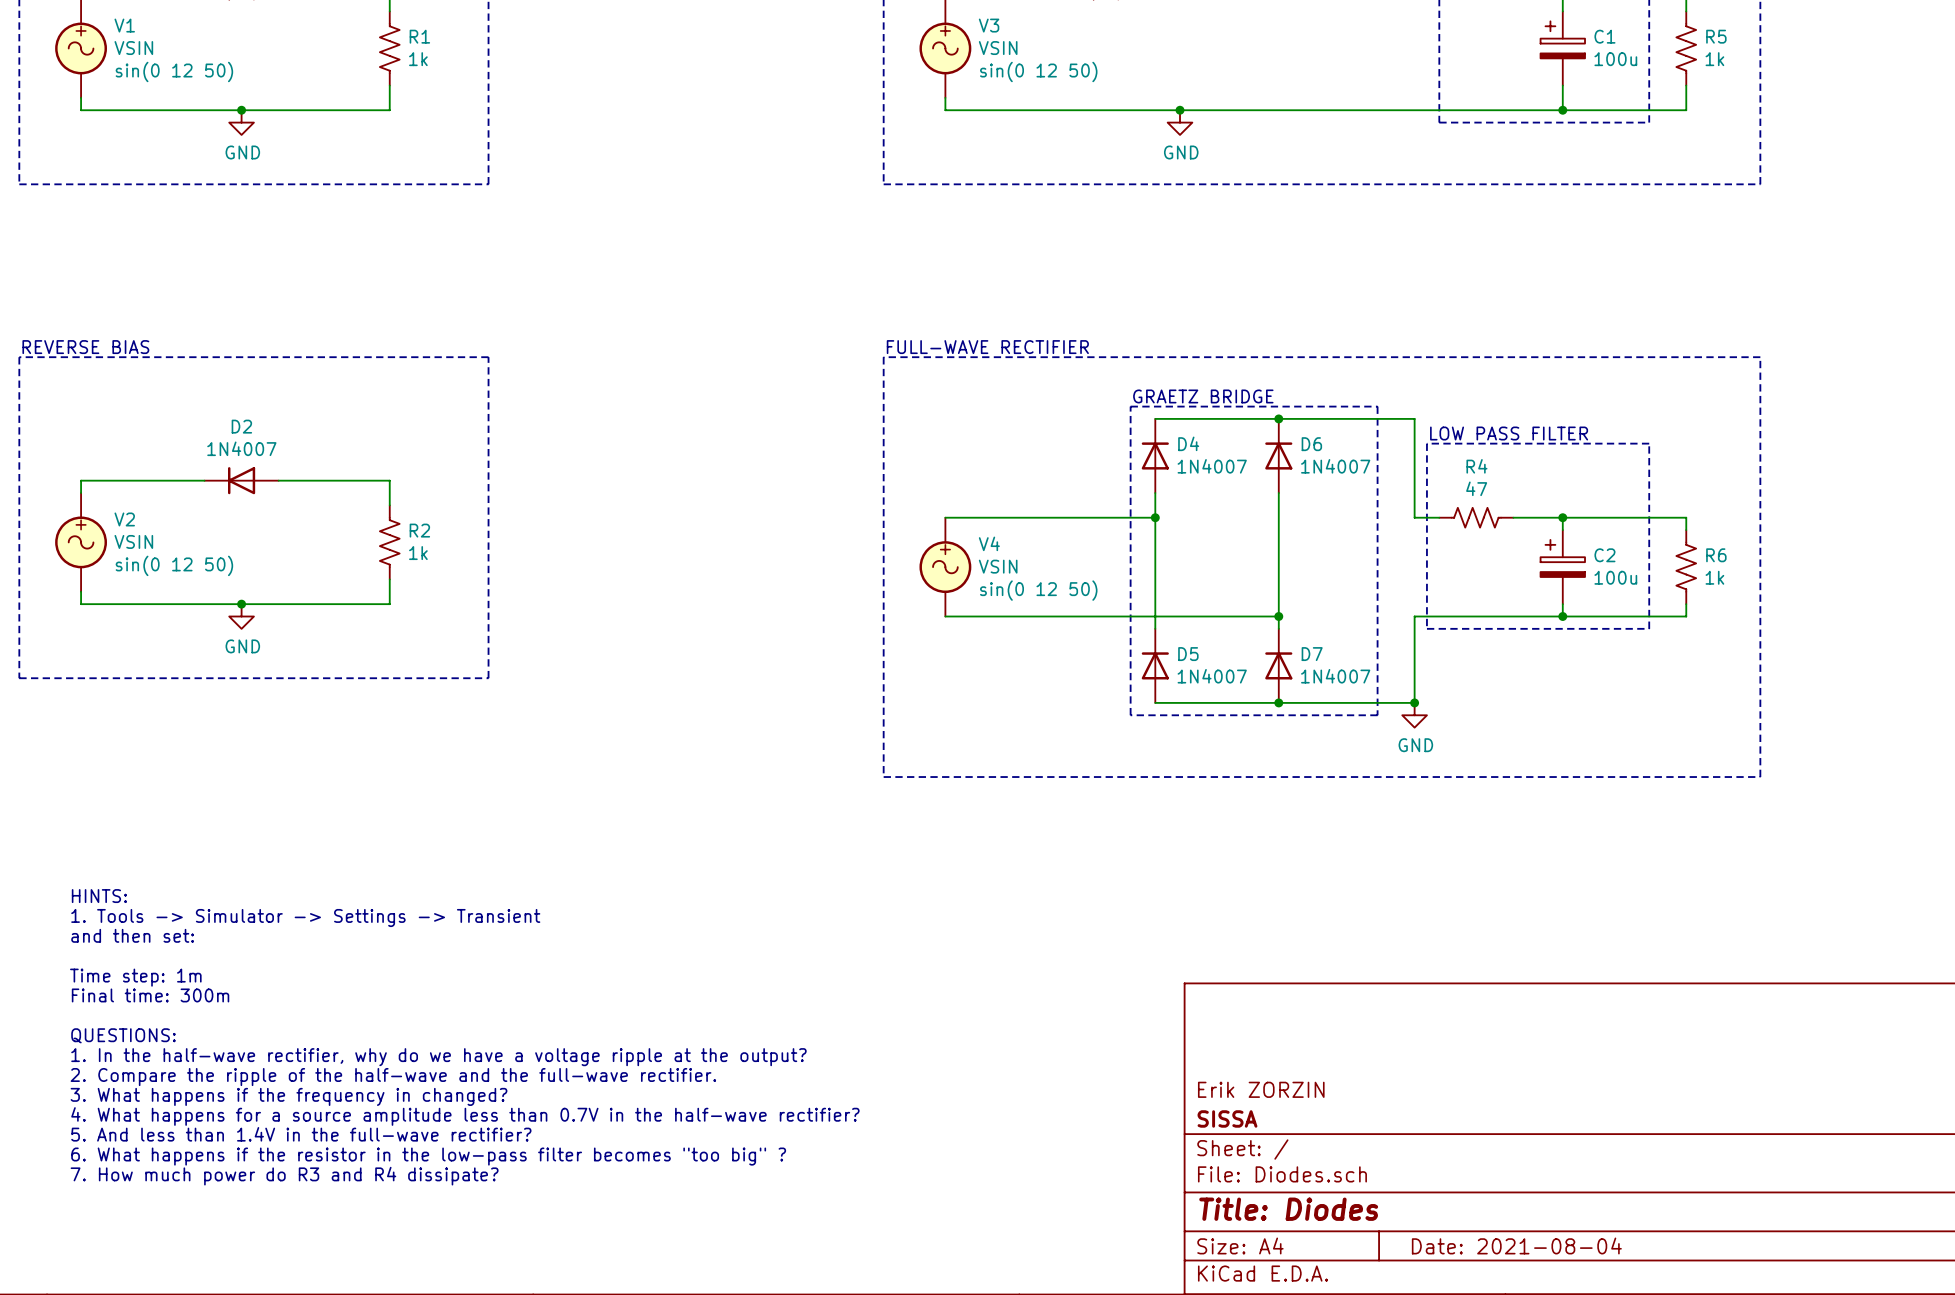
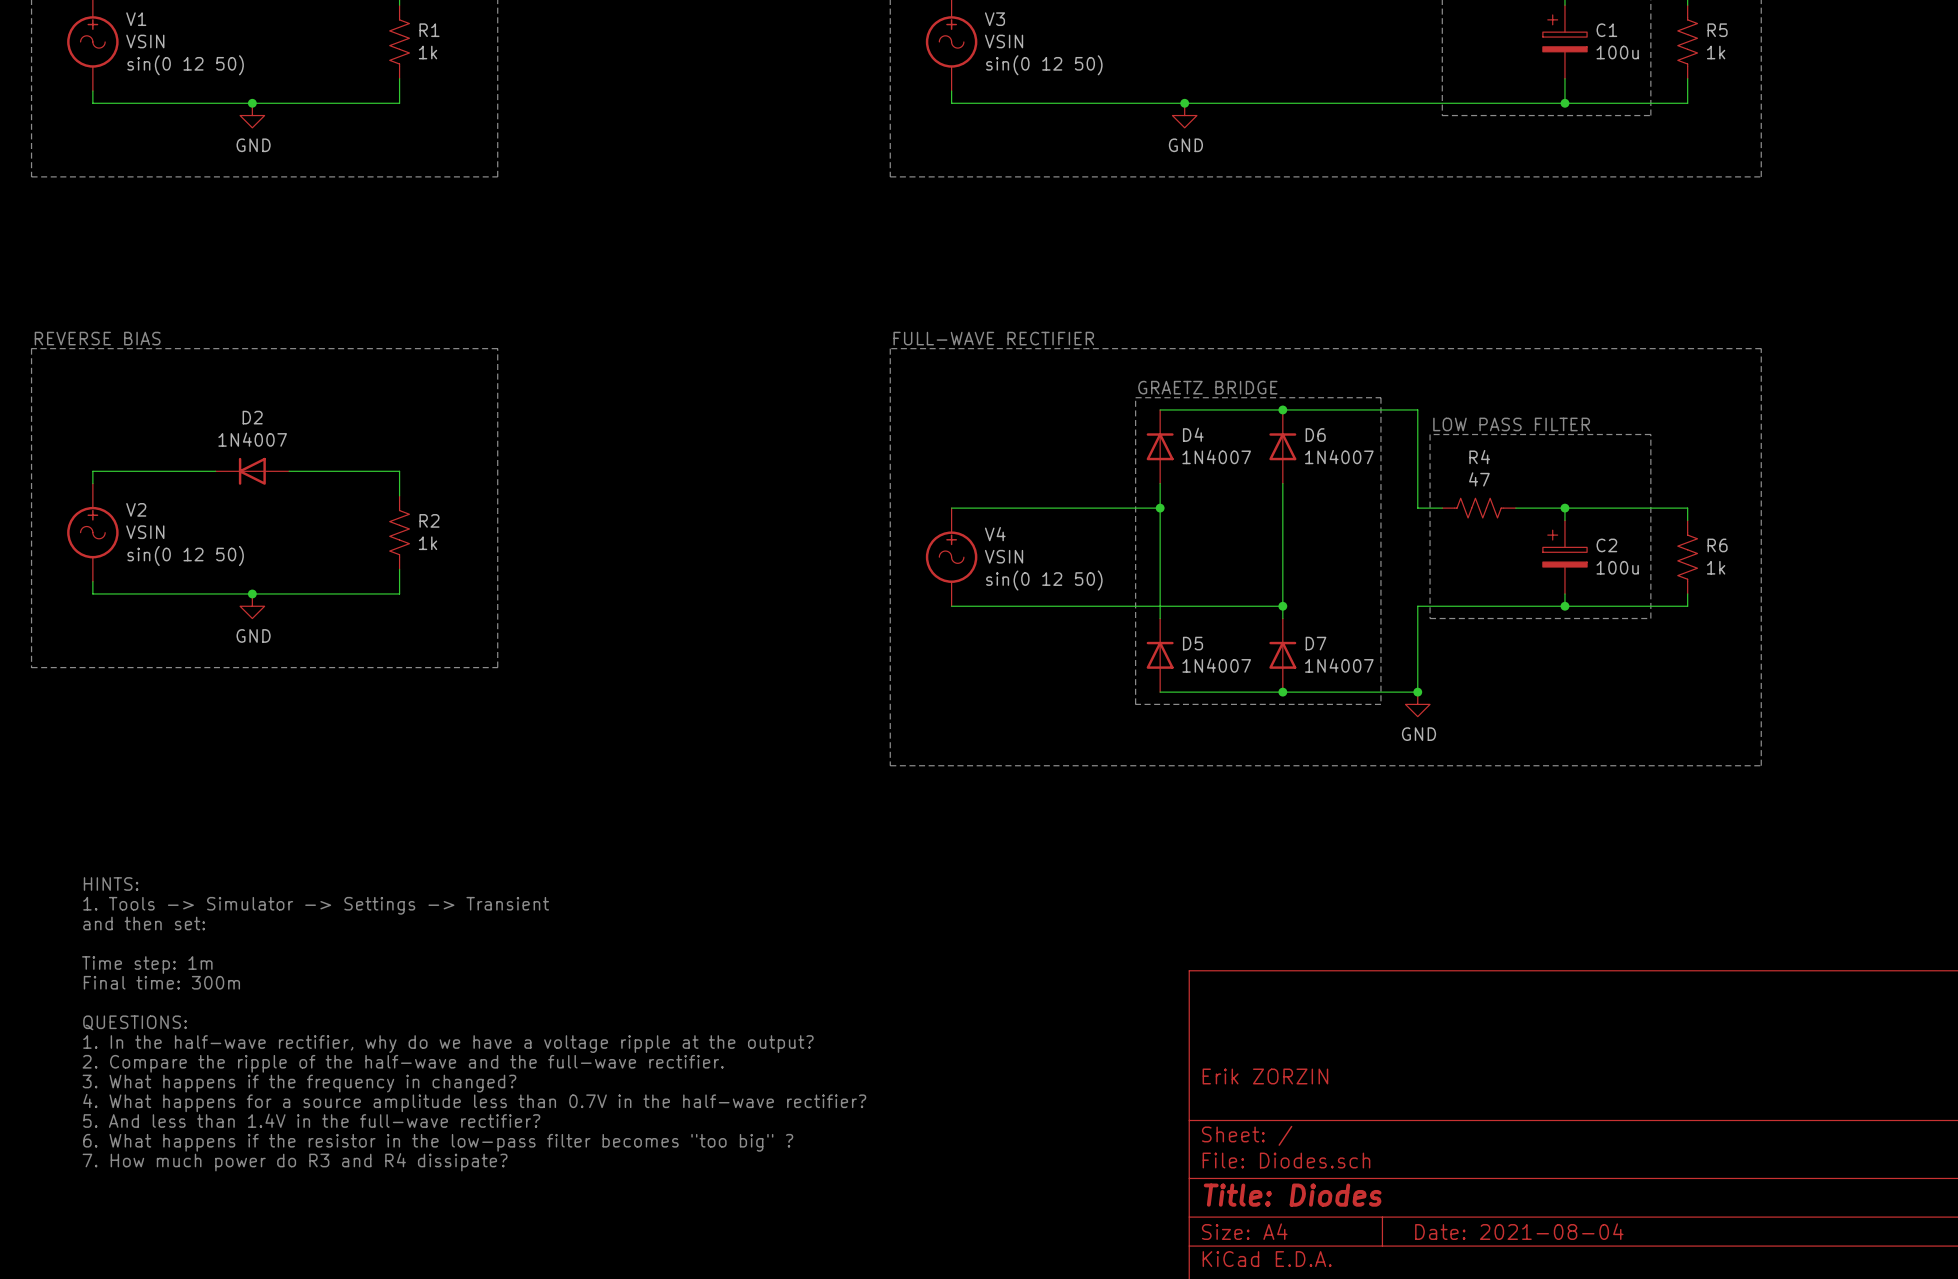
title block: SISSA (1227, 1118) -> none

